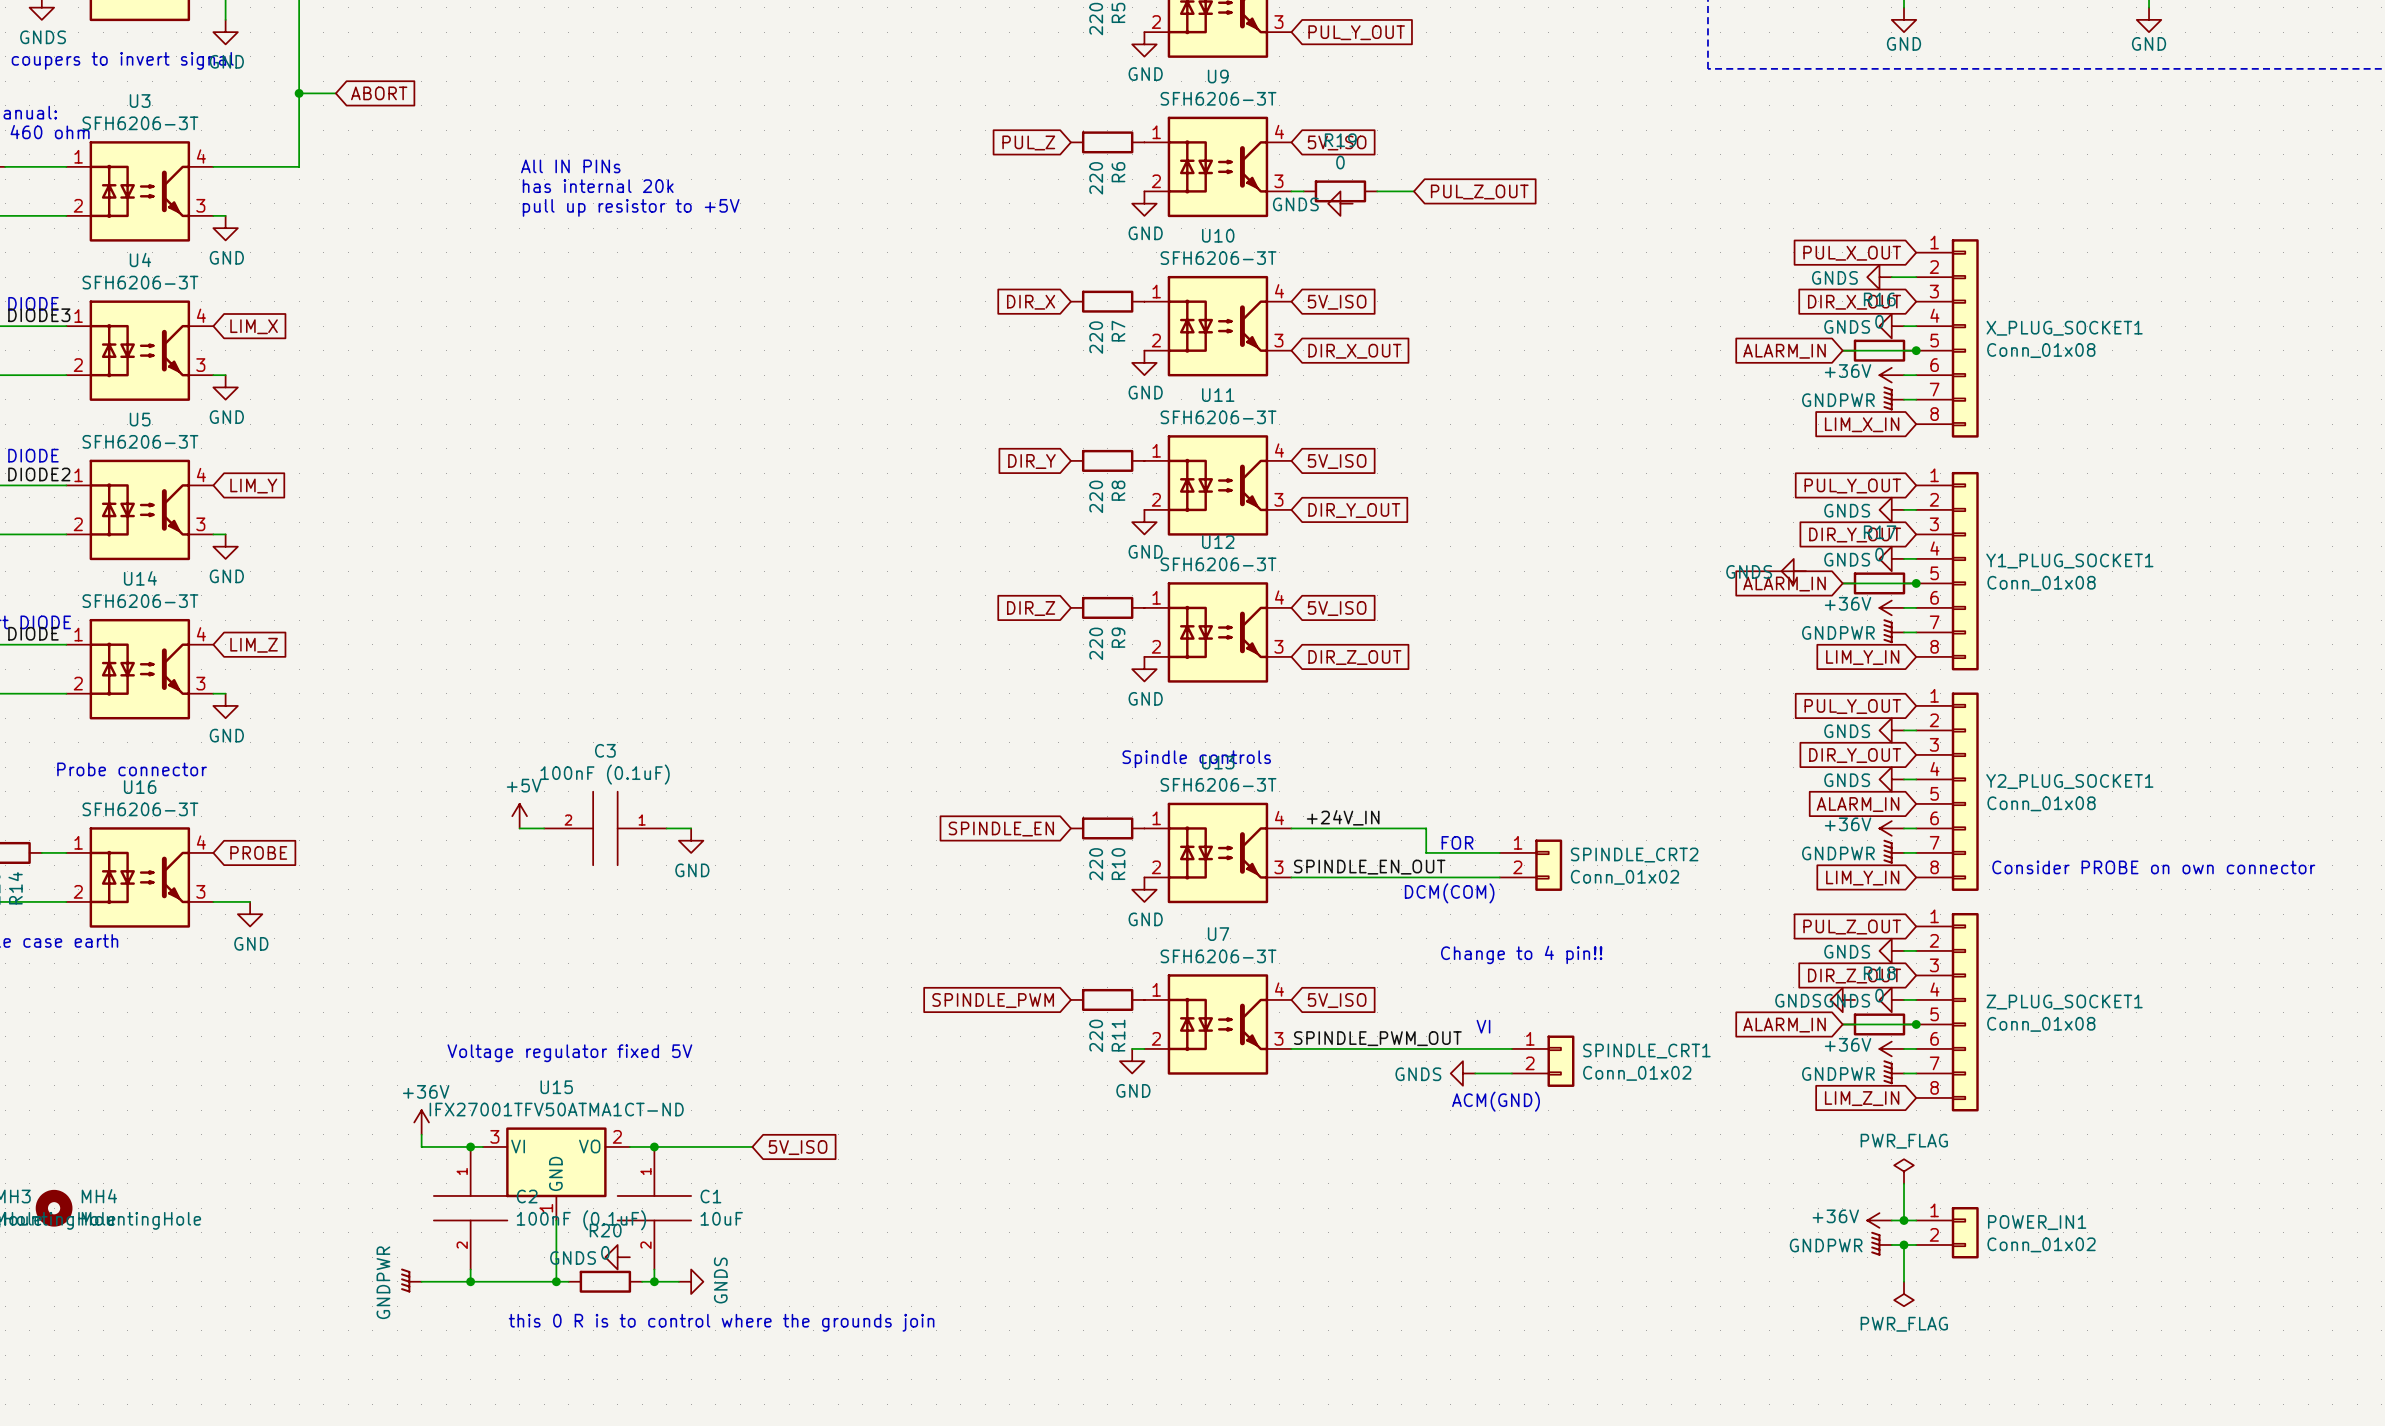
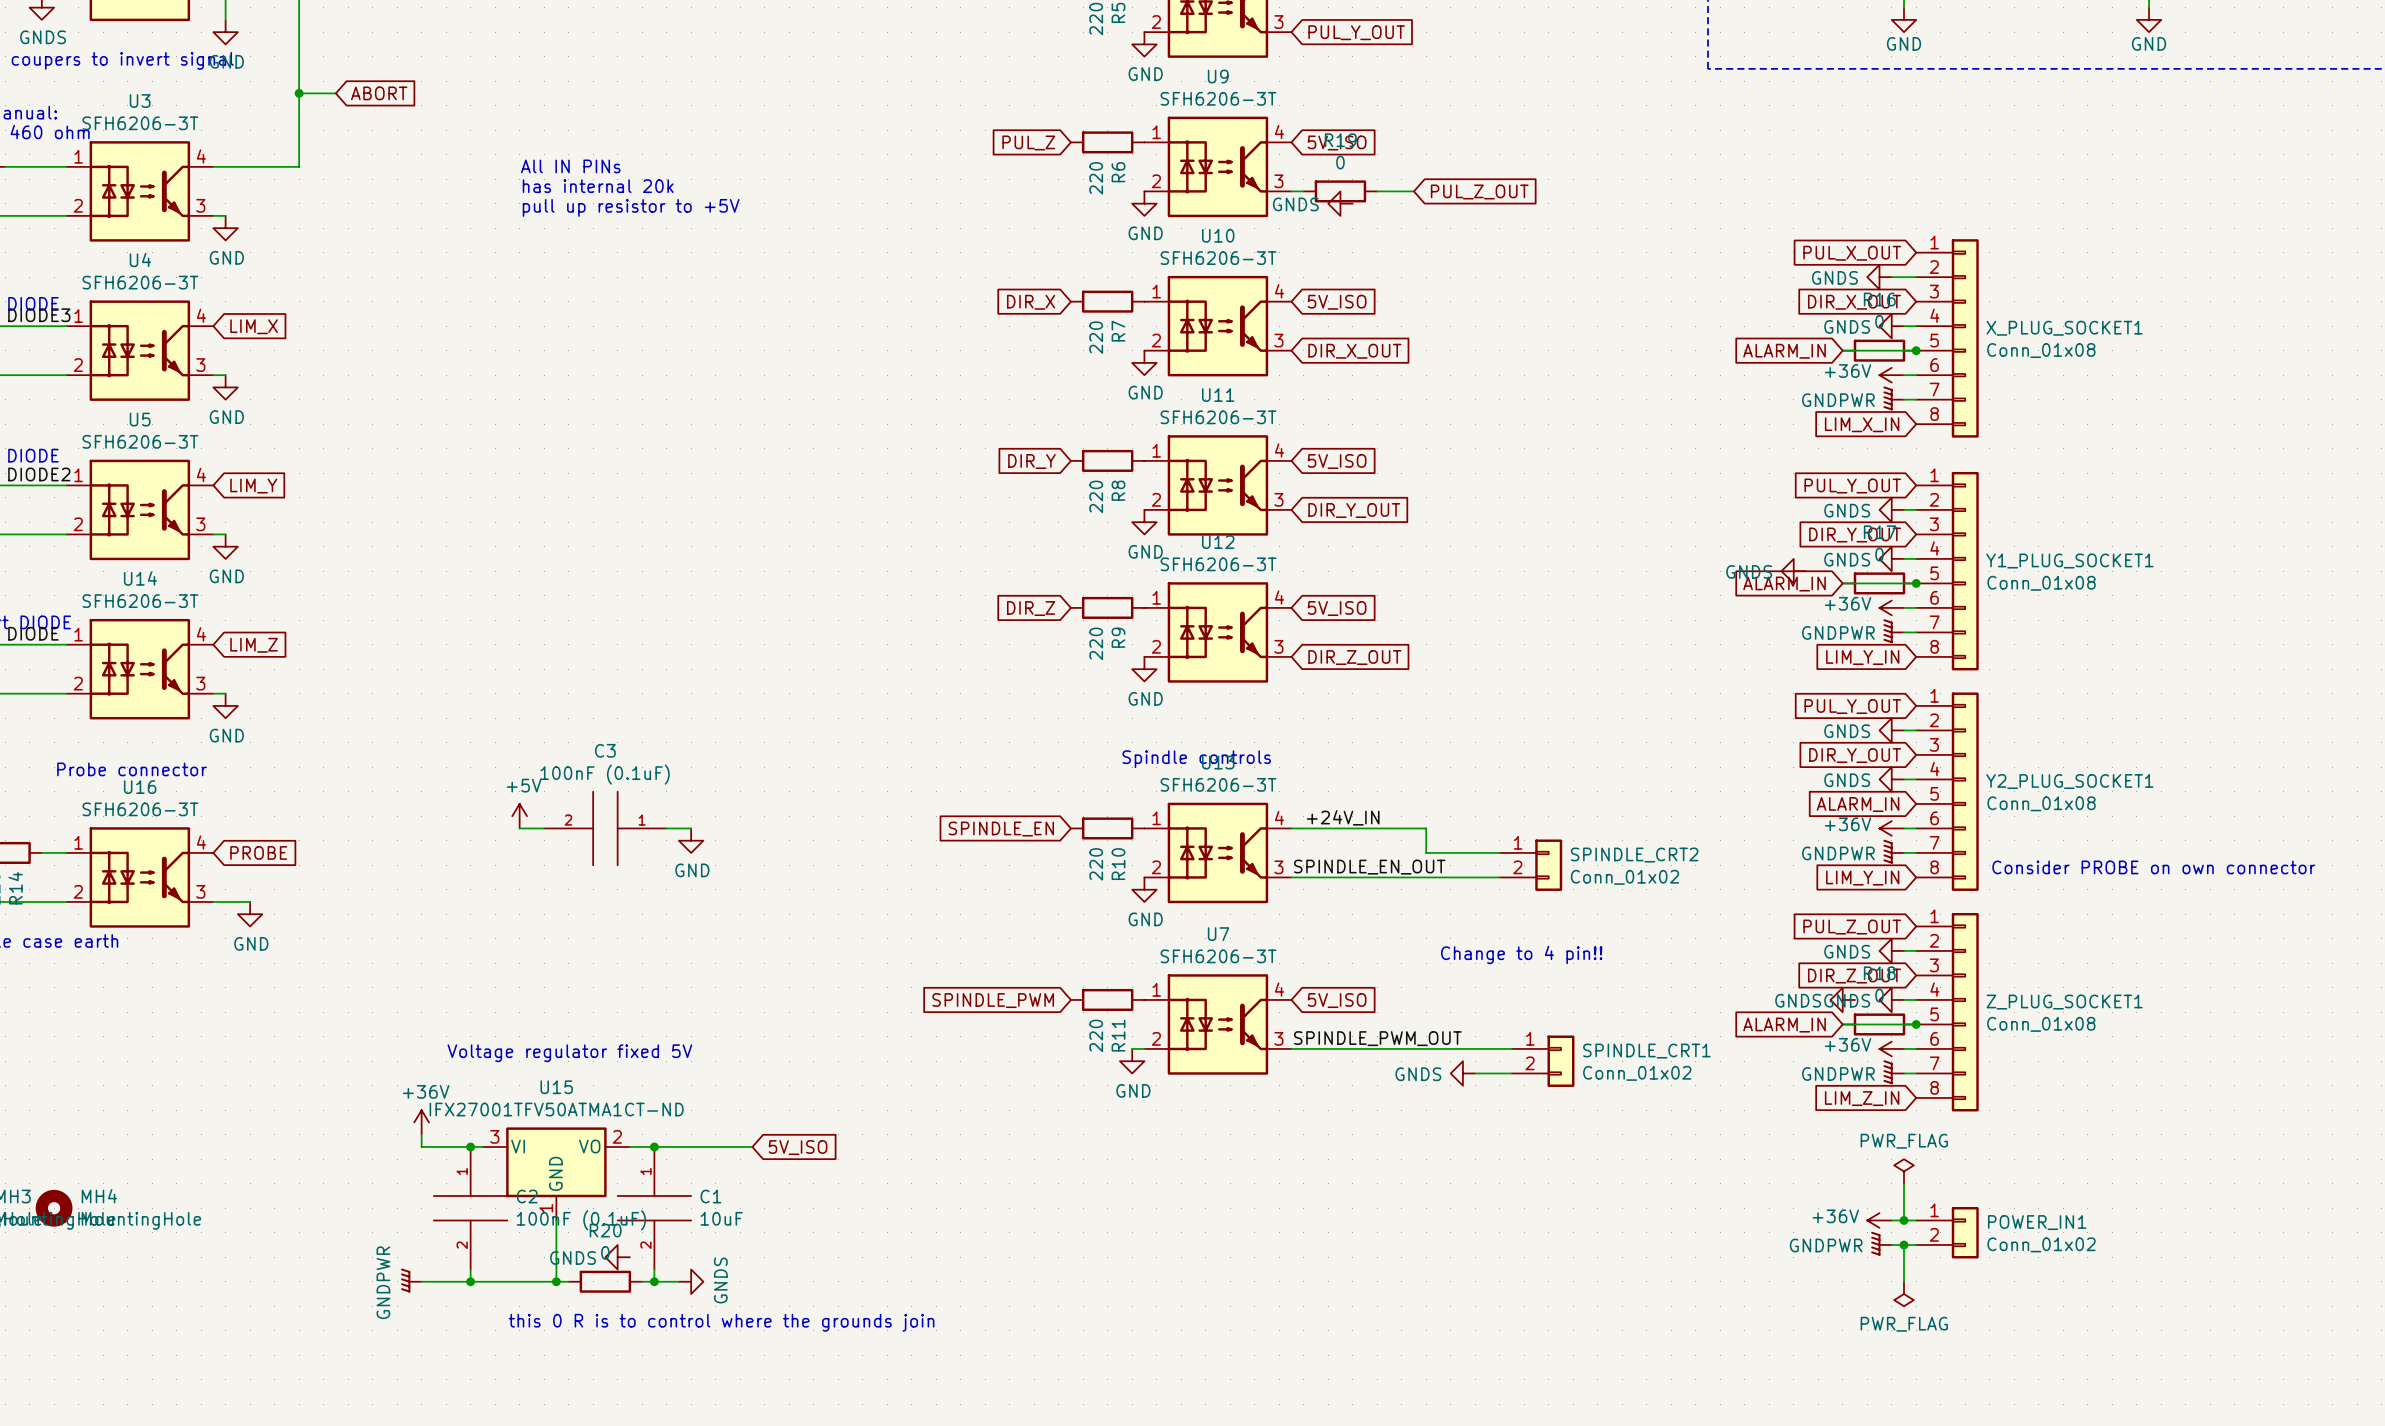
text: FOR (1457, 842) -> none
text: DCM(COM) (1449, 893) -> none
text: VI (1483, 1026) -> none
text: ACM(GND) (1496, 1101) -> none

